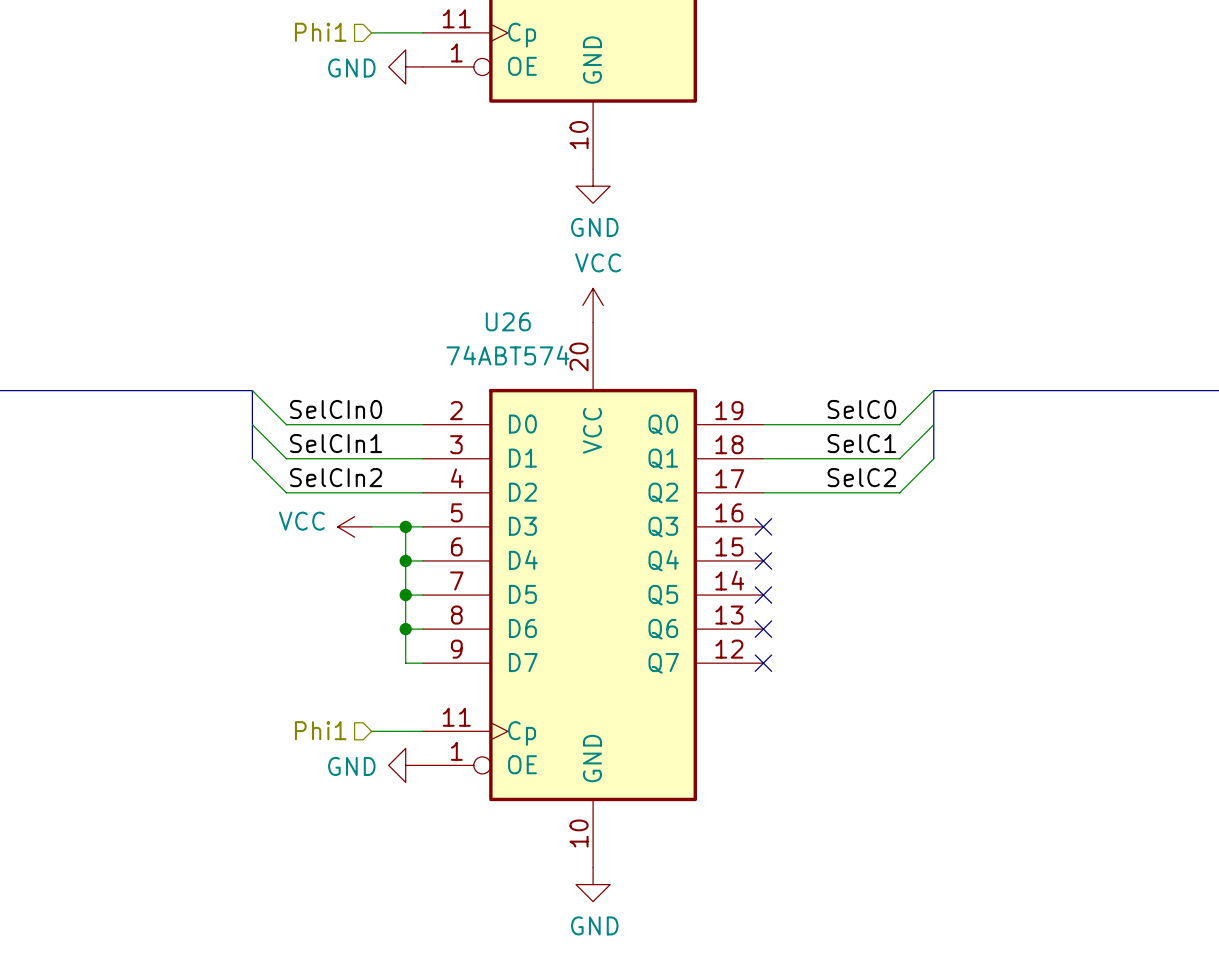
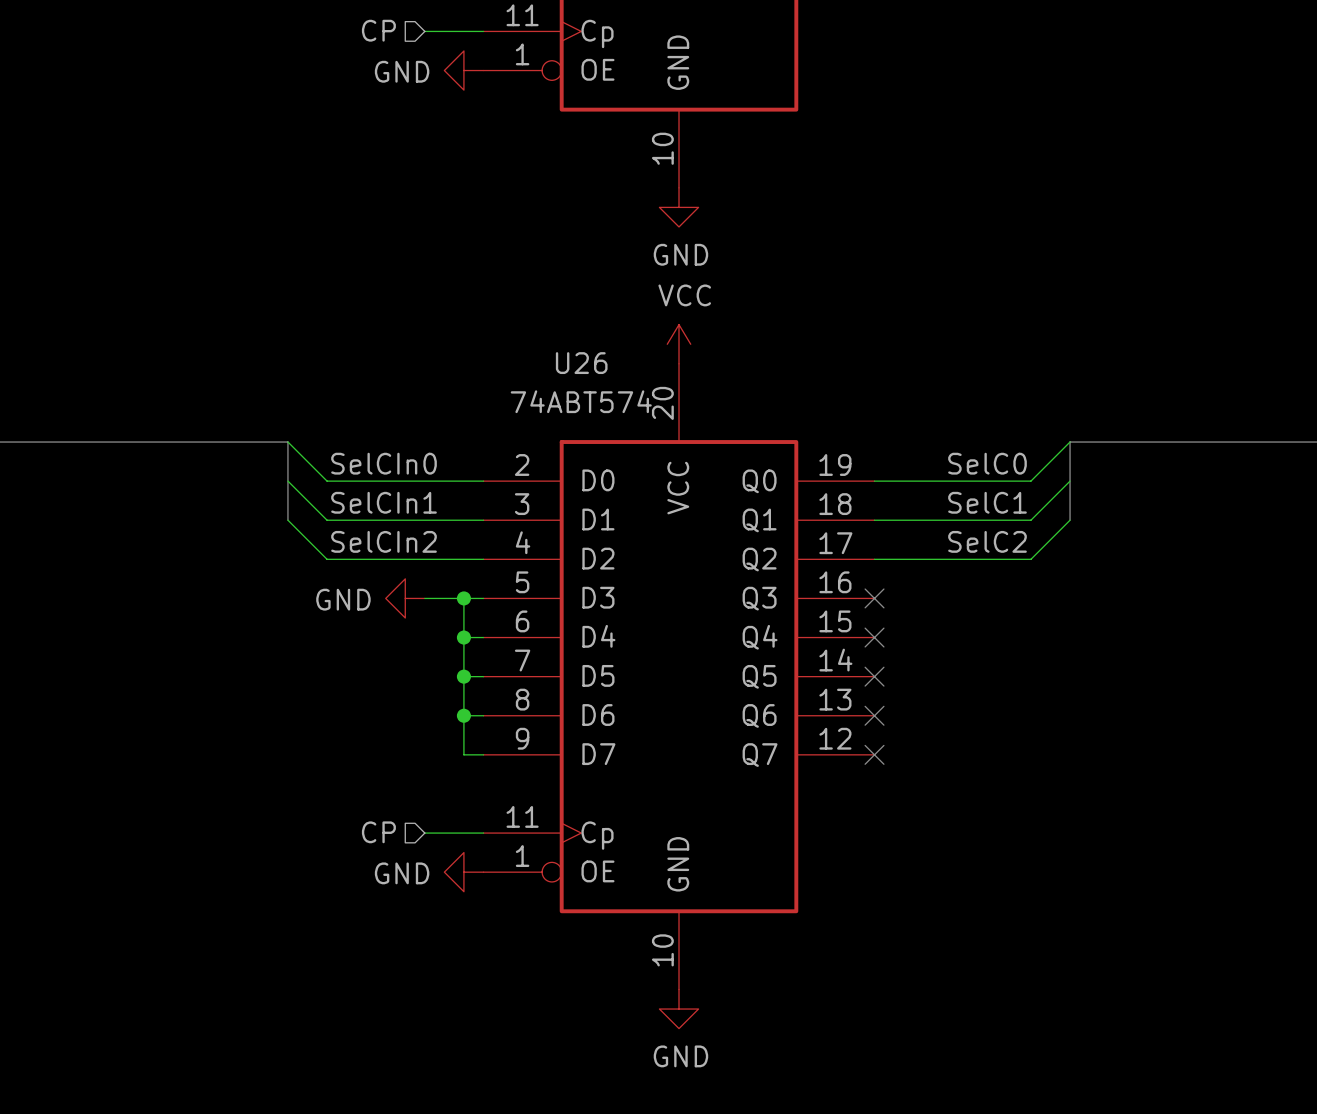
hierarchical label: Phi1 (320, 32) -> CP (378, 30)
power symbol: VCC (354, 526) -> GND (405, 598)
hierarchical label: Phi1 (320, 730) -> CP (378, 832)

